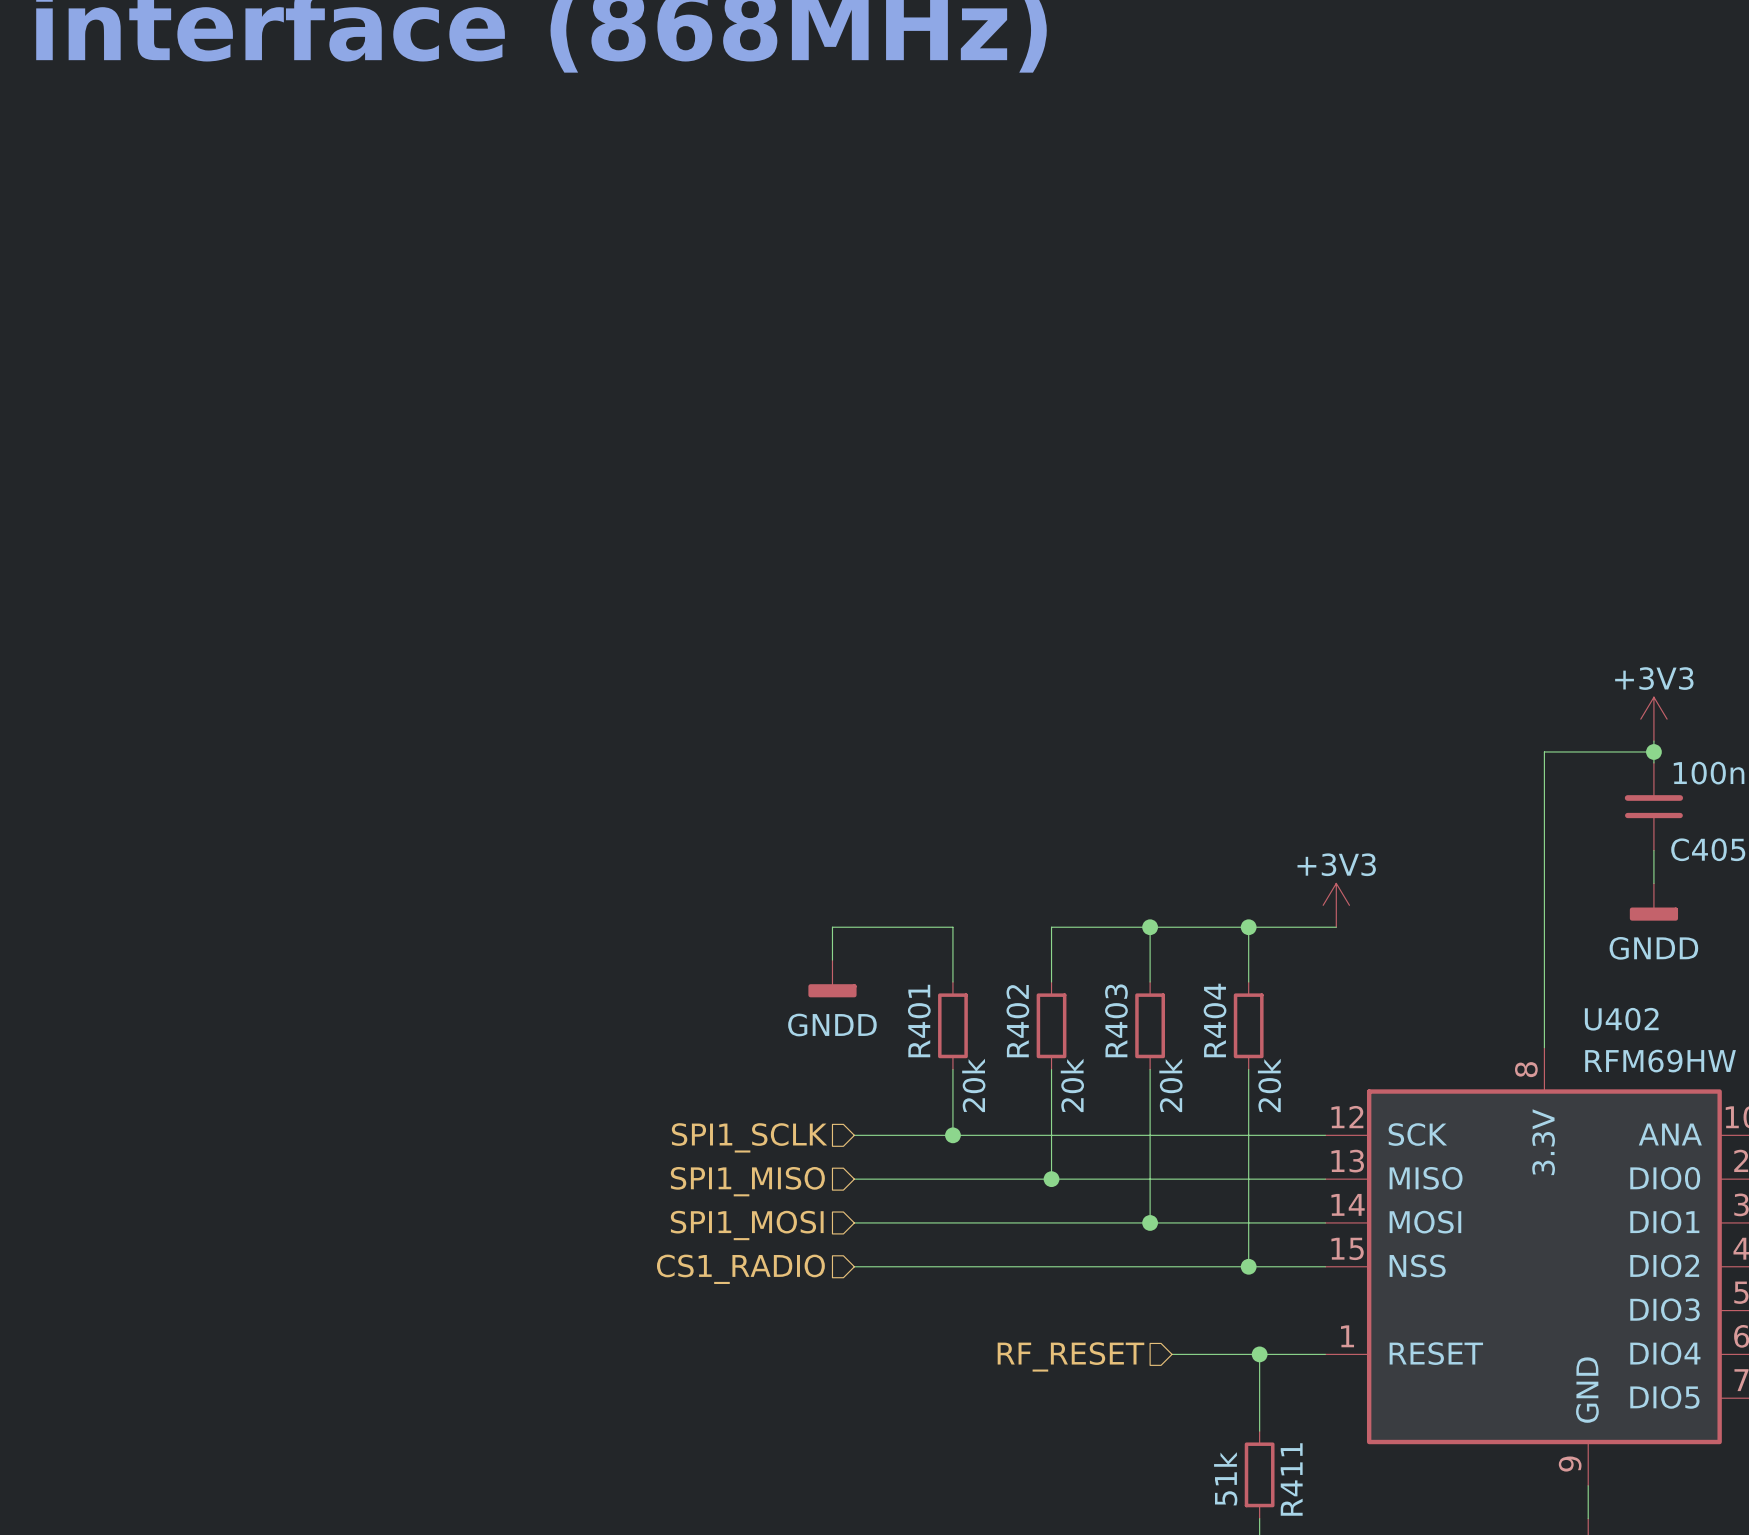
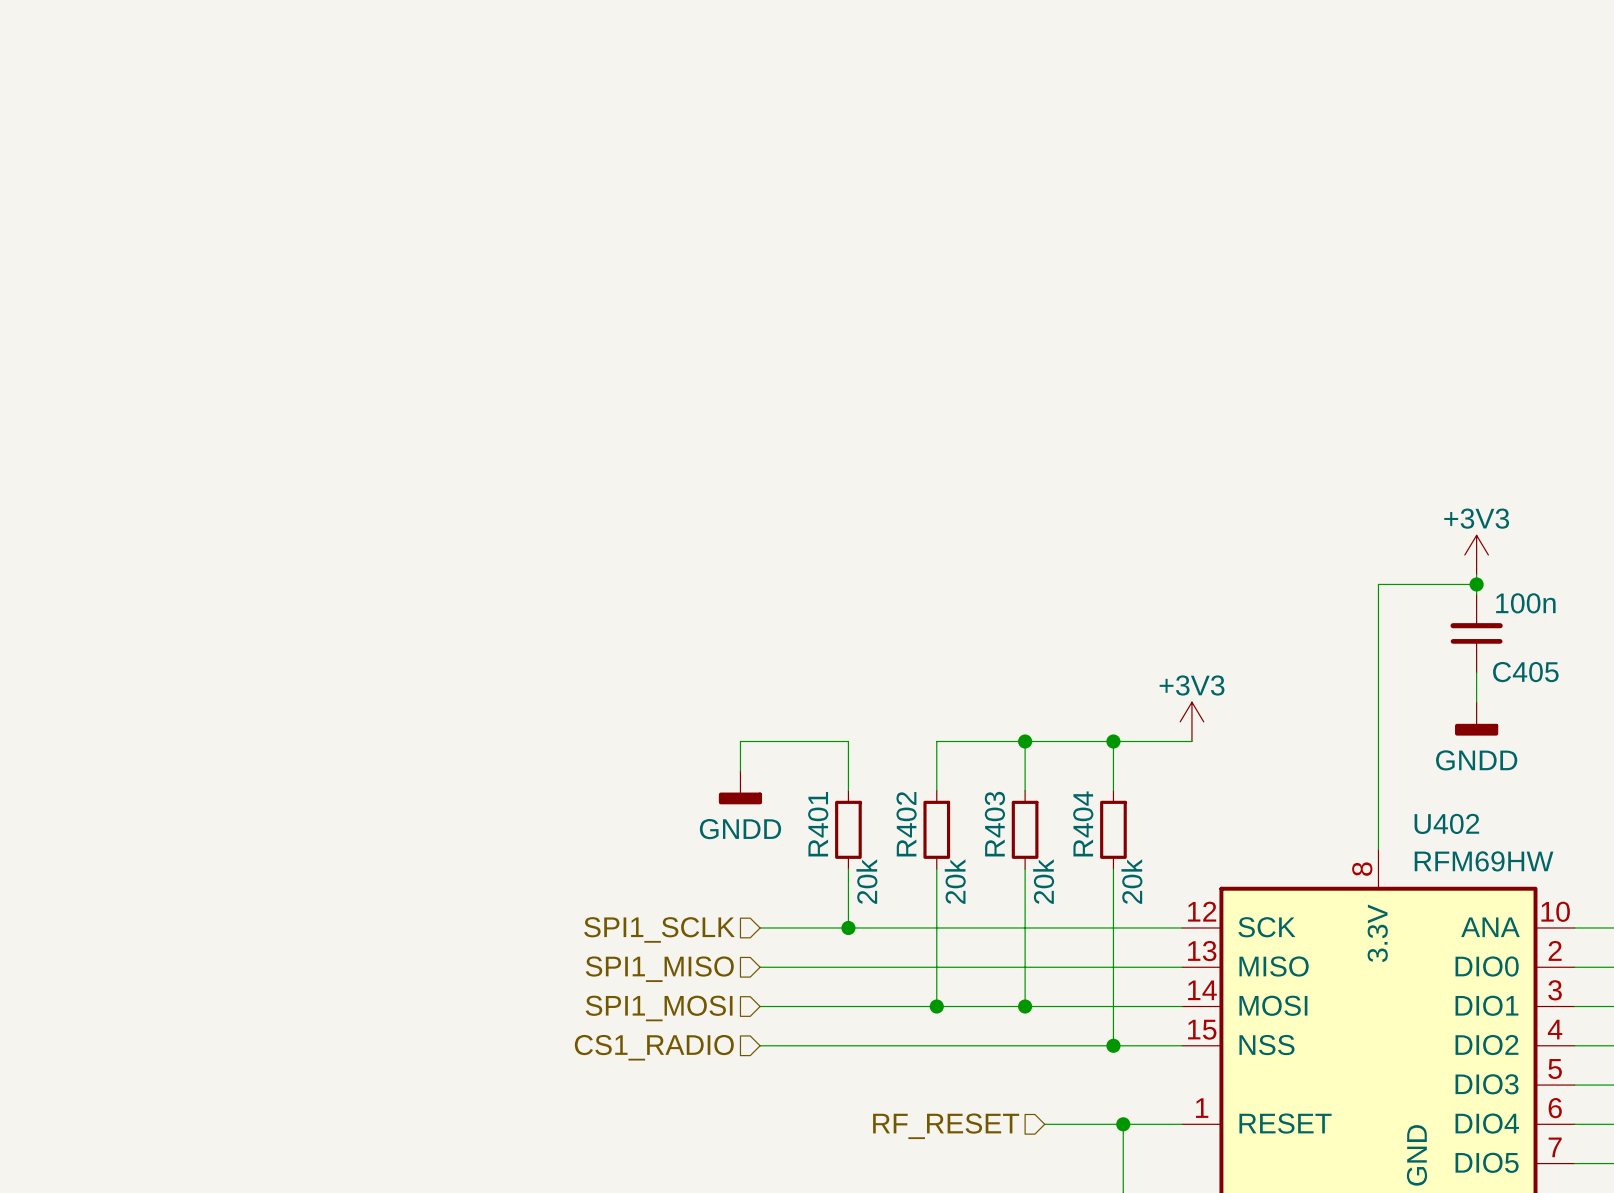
wire: none -> (936, 967) (936, 1006)
junction position: (1051, 1179) -> (936, 1006)

